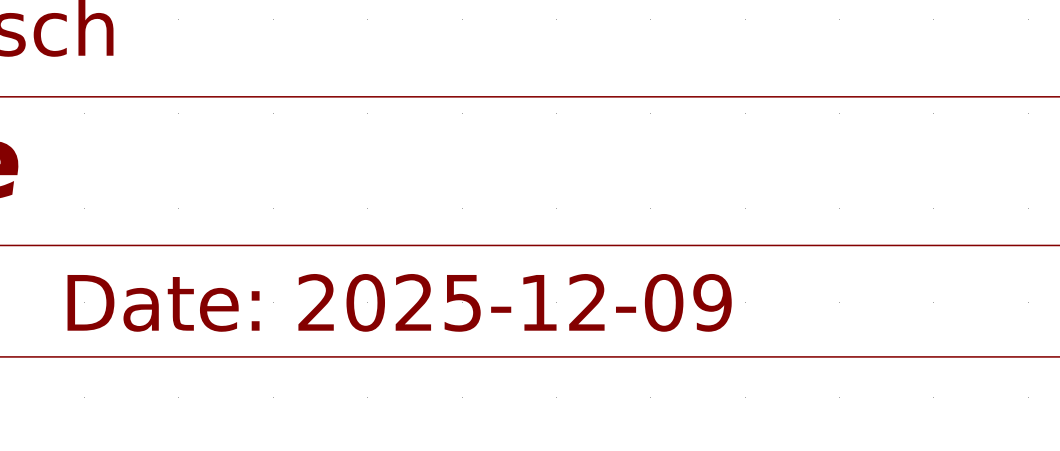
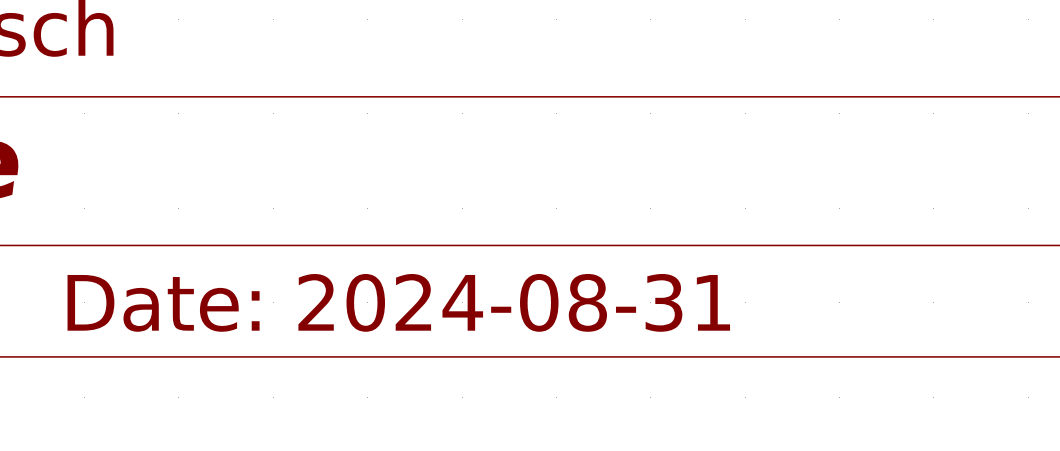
title block: Date: 2025-12-09 (399, 302) -> Date: 2024-08-31 (398, 302)

